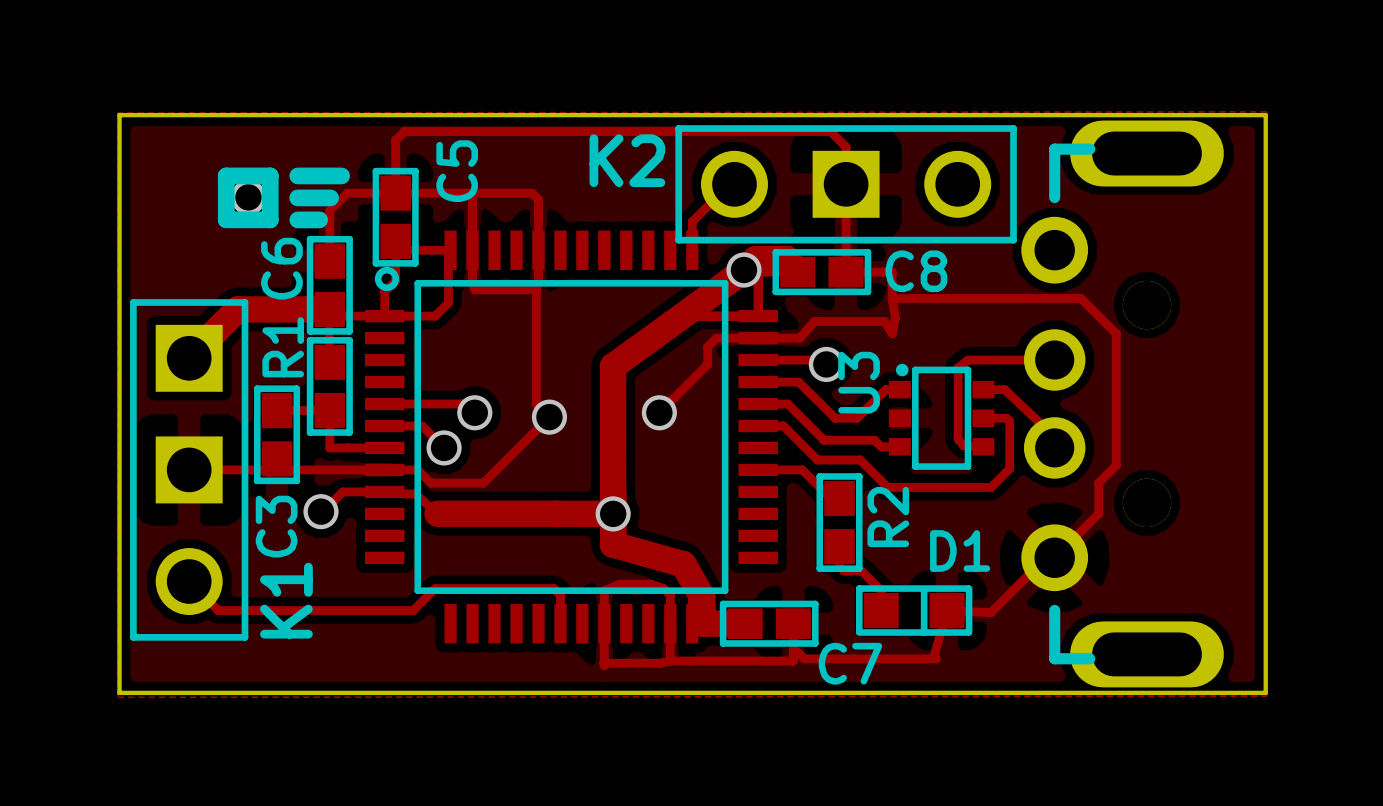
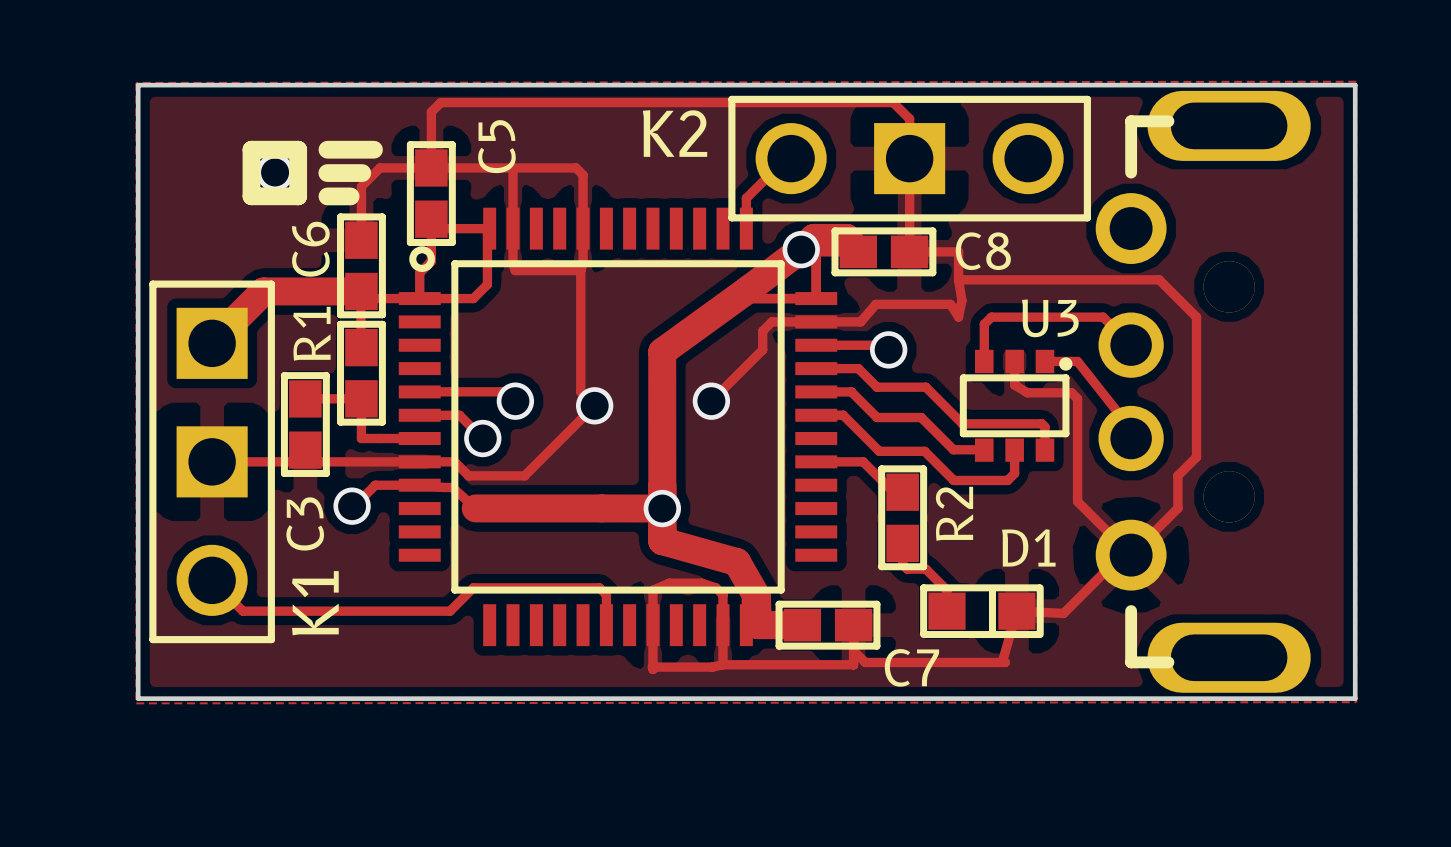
track: (1054, 359) (967, 360) (958, 367) (958, 439) (963, 445) (983, 446) -> (1131, 345) (1103, 317) (991, 317) (984, 324) (984, 361)
track: none -> (1014, 361) (1014, 385) (1027, 392) (1071, 392) (1077, 398) (1077, 501) (1131, 555)
track: (798, 382) (835, 418) (857, 418) (885, 389) (899, 389) -> (858, 368) (877, 387) (925, 387) (962, 423) (1041, 423) (1044, 426) (1044, 450)
track: (983, 389) (1004, 389) (1054, 436) (1054, 439) -> (1044, 361) (1077, 361) (1131, 429)
track: (787, 404) (824, 440) (874, 440) (881, 446) (899, 446) -> (847, 391) (851, 391) (877, 417) (921, 417) (953, 449) (983, 449)
U3 rotation: 0° (941, 416) -> 90° clockwise (1016, 405)
track: (983, 418) (1006, 418) (1009, 421) (1009, 468) (991, 487) (938, 487) -> (1014, 450) (1014, 473) (1007, 480)

